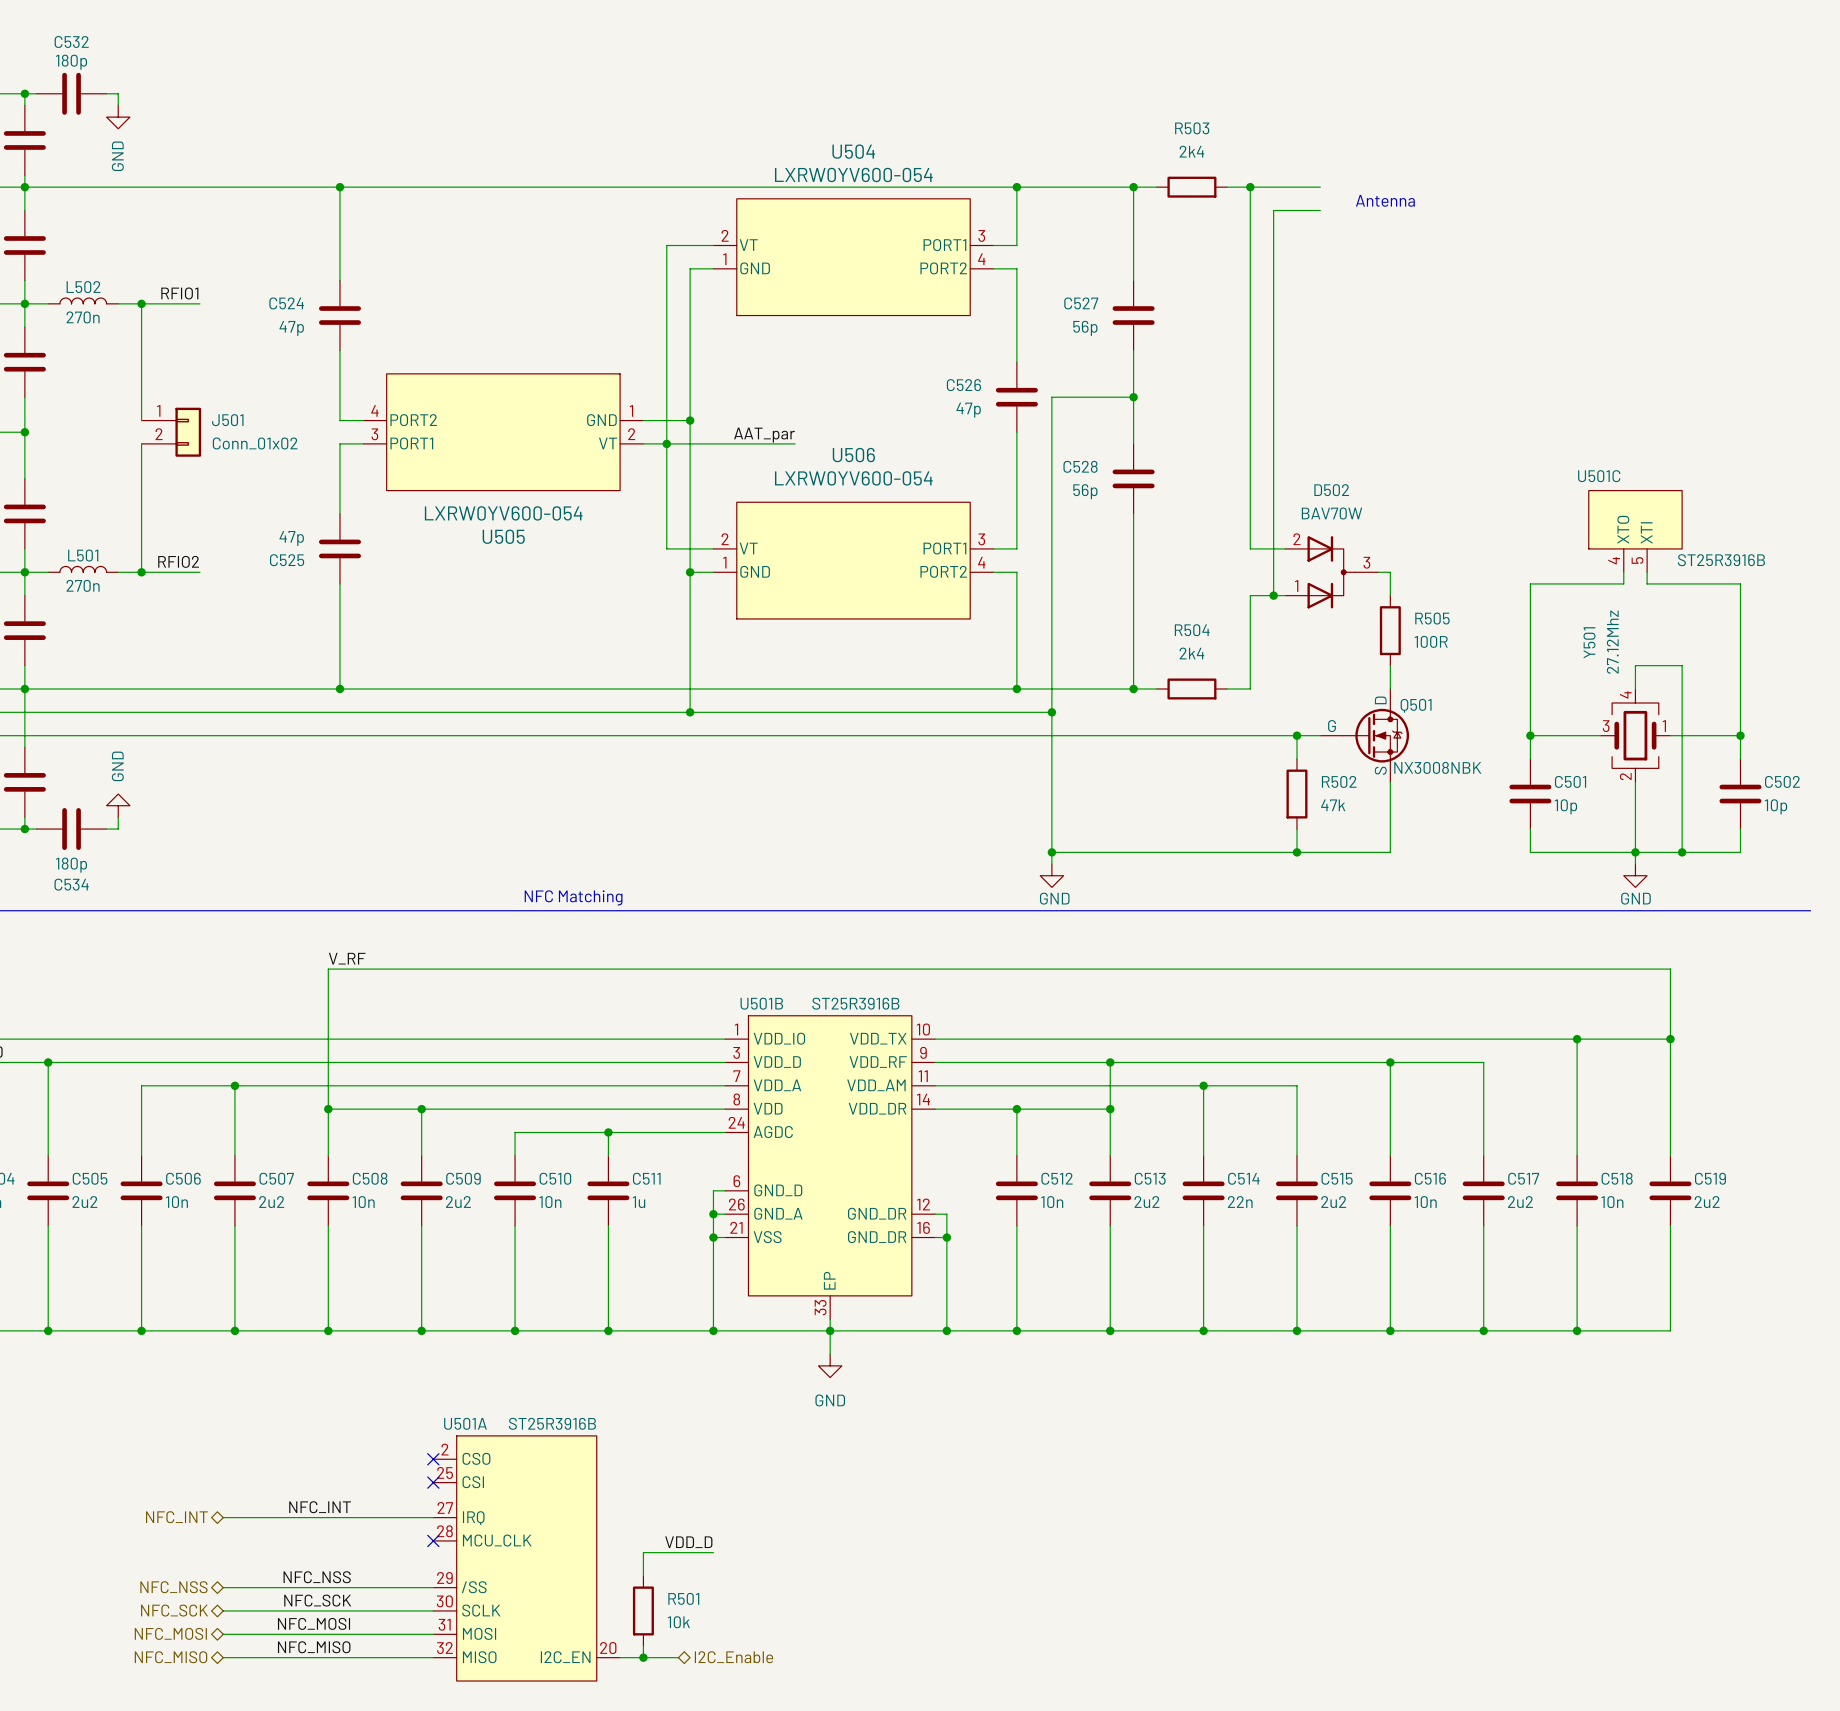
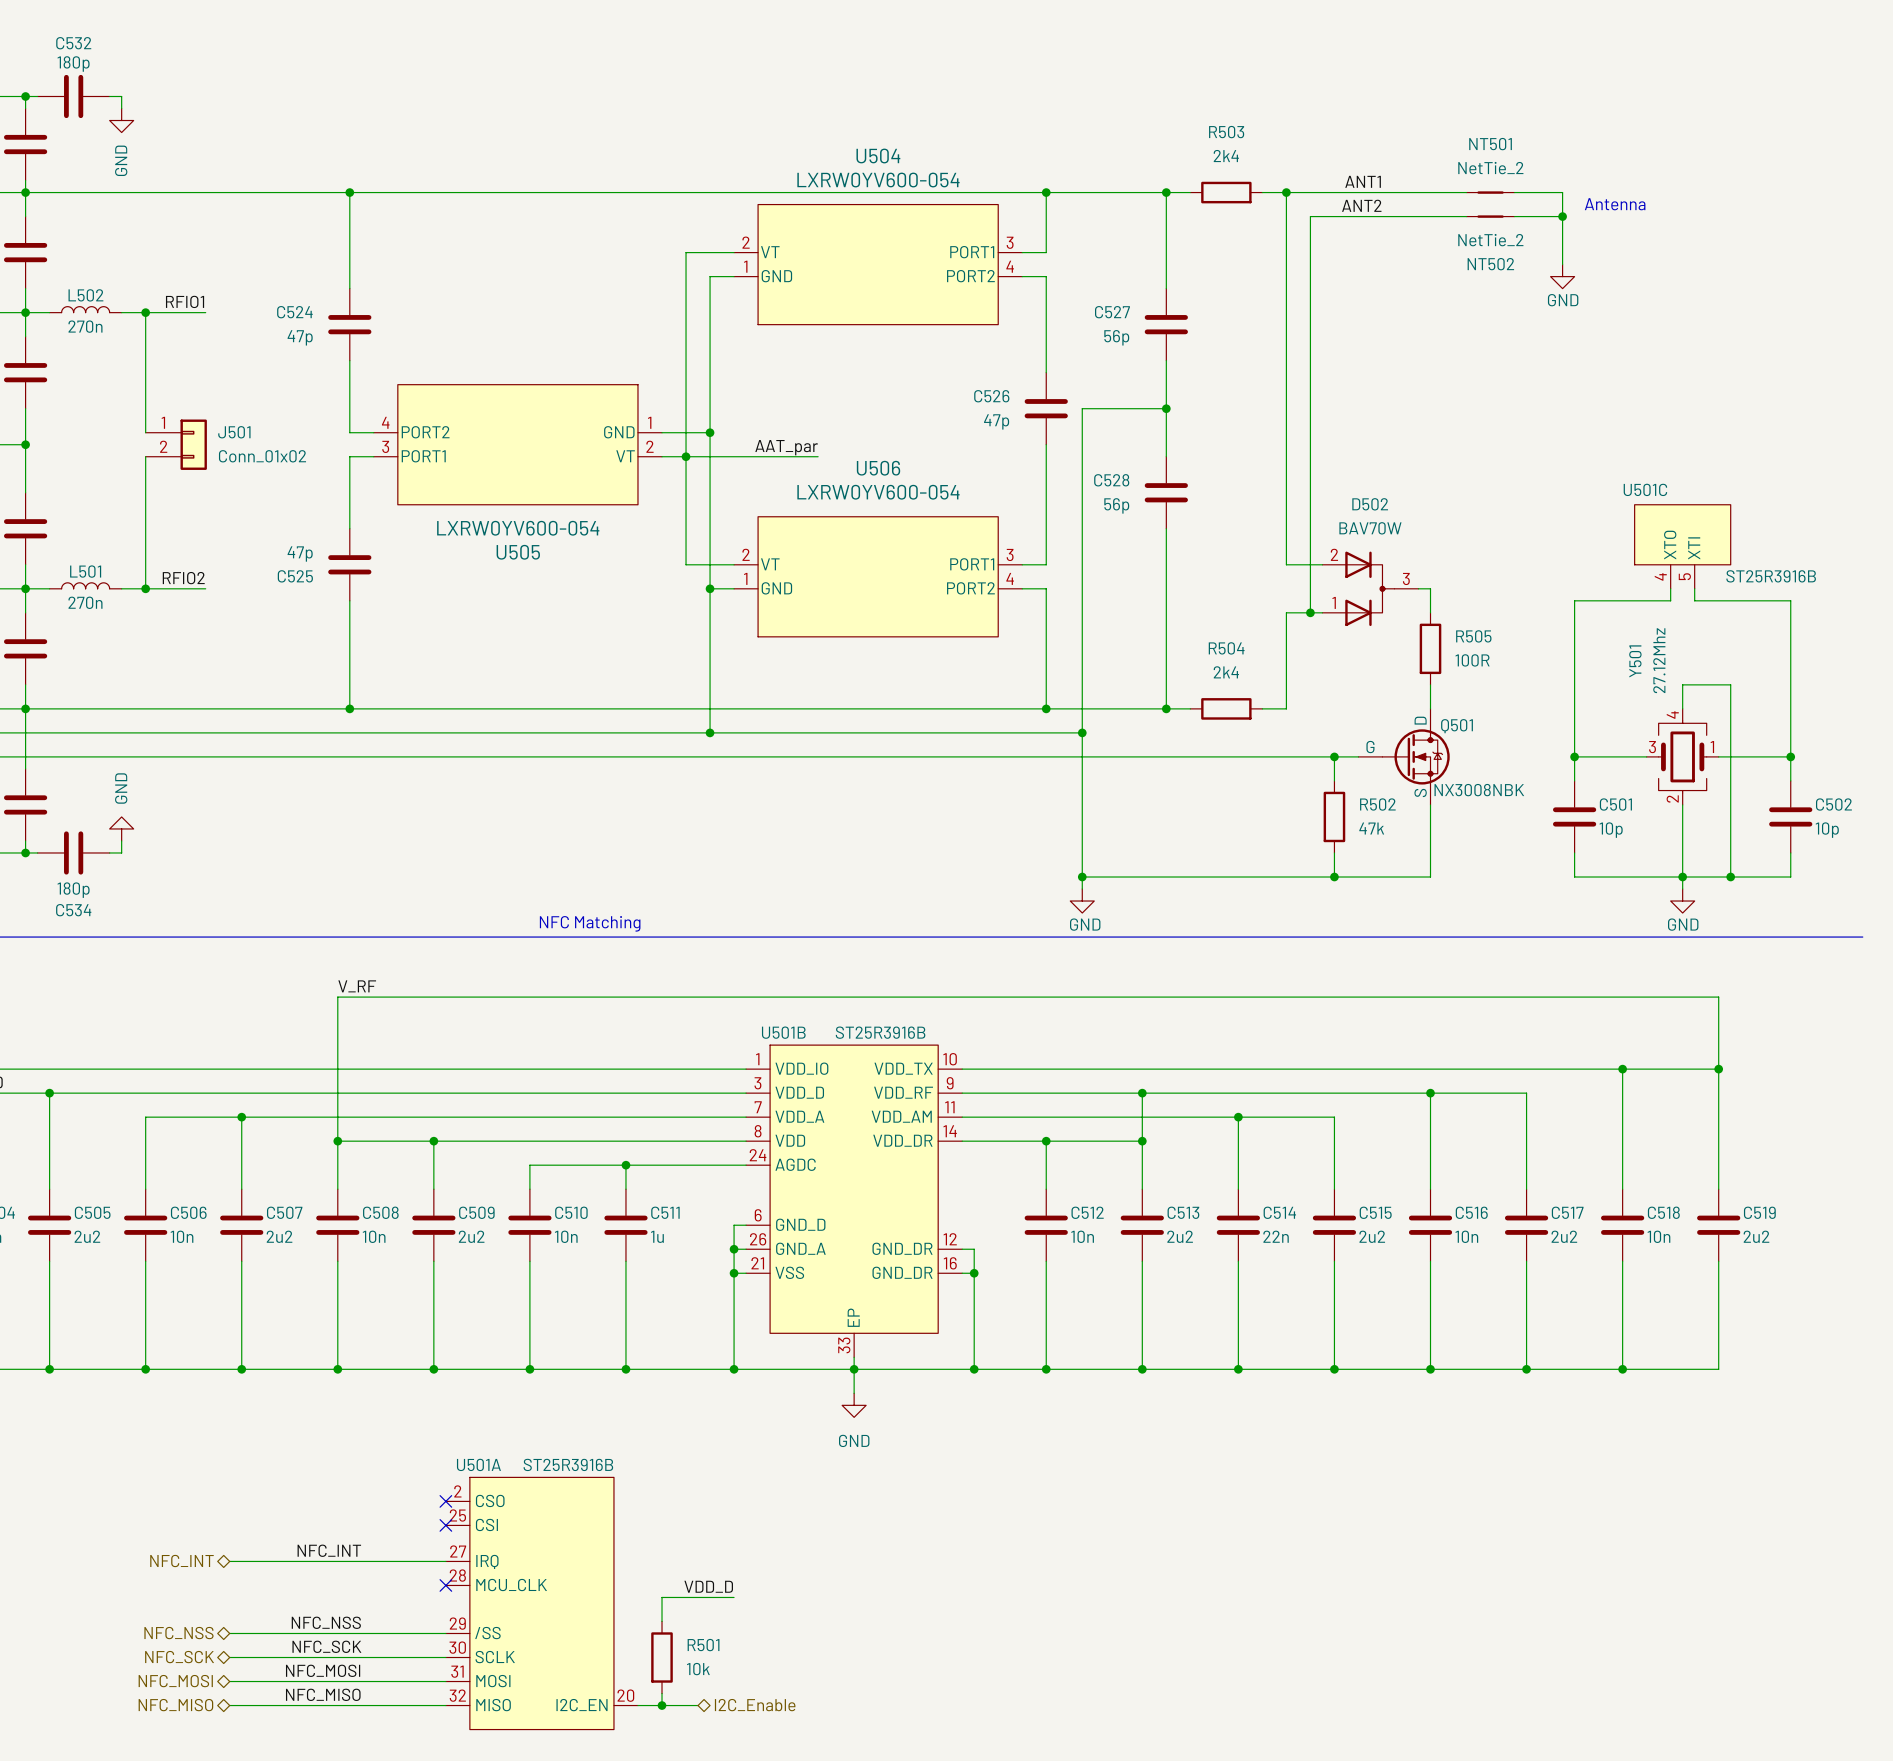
label: none -> ANT1 (1363, 181)
wire: none -> (1358, 192) (1466, 192)
NT501: none -> NetTie_2 (1490, 192)
wire: none -> (1514, 192) (1562, 192) (1562, 264)
label: none -> ANT2 (1361, 205)
text position: Antenna (1385, 200) -> Antenna (1615, 204)
wire: none -> (1358, 216) (1466, 216)
NT502: none -> NetTie_2 (1490, 216)
wire: none -> (1514, 216) (1562, 216)
junction: none -> (1562, 216)
power symbol: none -> GND (1562, 276)

